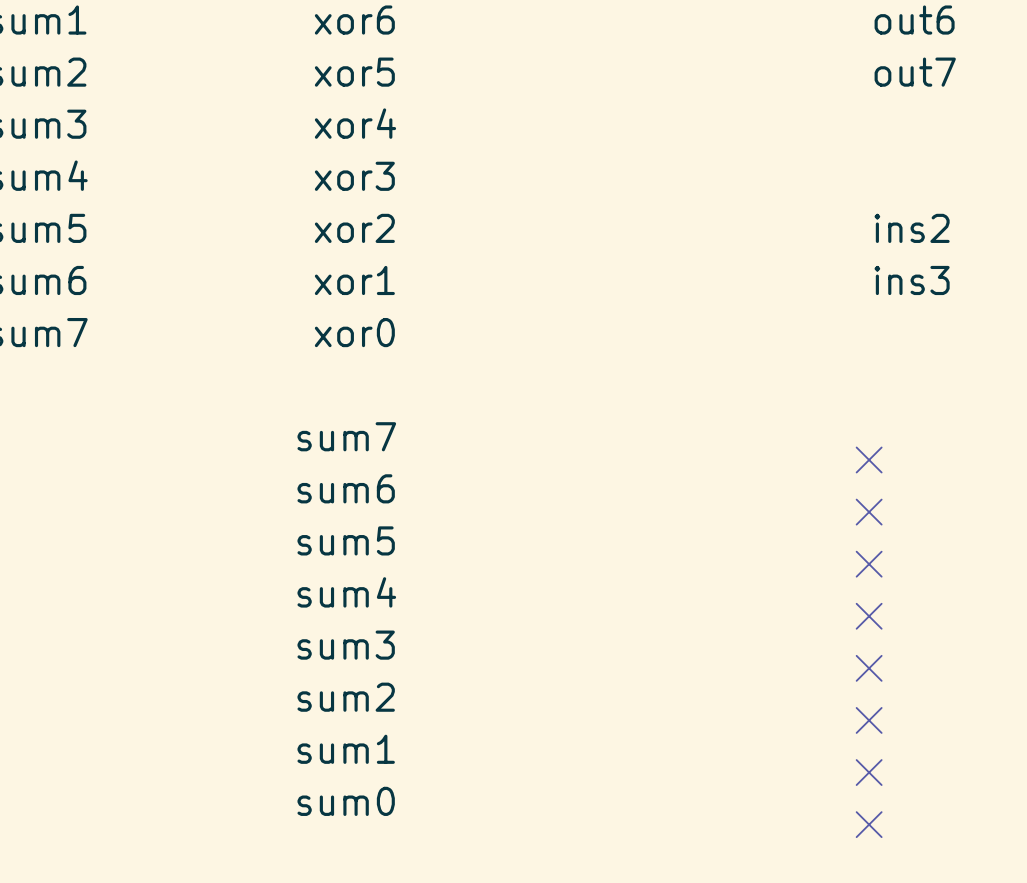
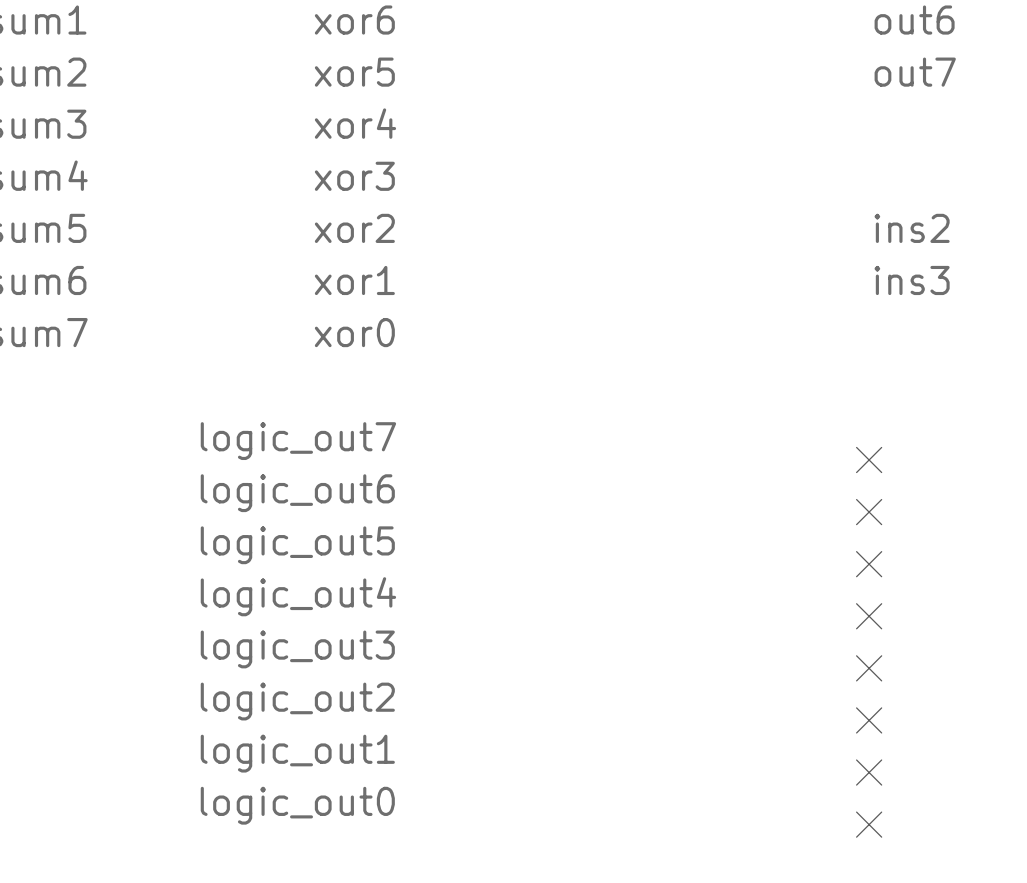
label: sum7 (346, 436) -> logic_out7 (298, 441)
label: sum6 (346, 488) -> logic_out6 (297, 493)
label: sum5 (346, 540) -> logic_out5 (297, 545)
label: sum4 (346, 592) -> logic_out4 (298, 596)
label: sum3 (346, 645) -> logic_out3 (297, 649)
label: sum2 (346, 697) -> logic_out2 (297, 701)
label: sum1 (346, 749) -> logic_out1 (297, 753)
label: sum0 (346, 801) -> logic_out0 (297, 805)

